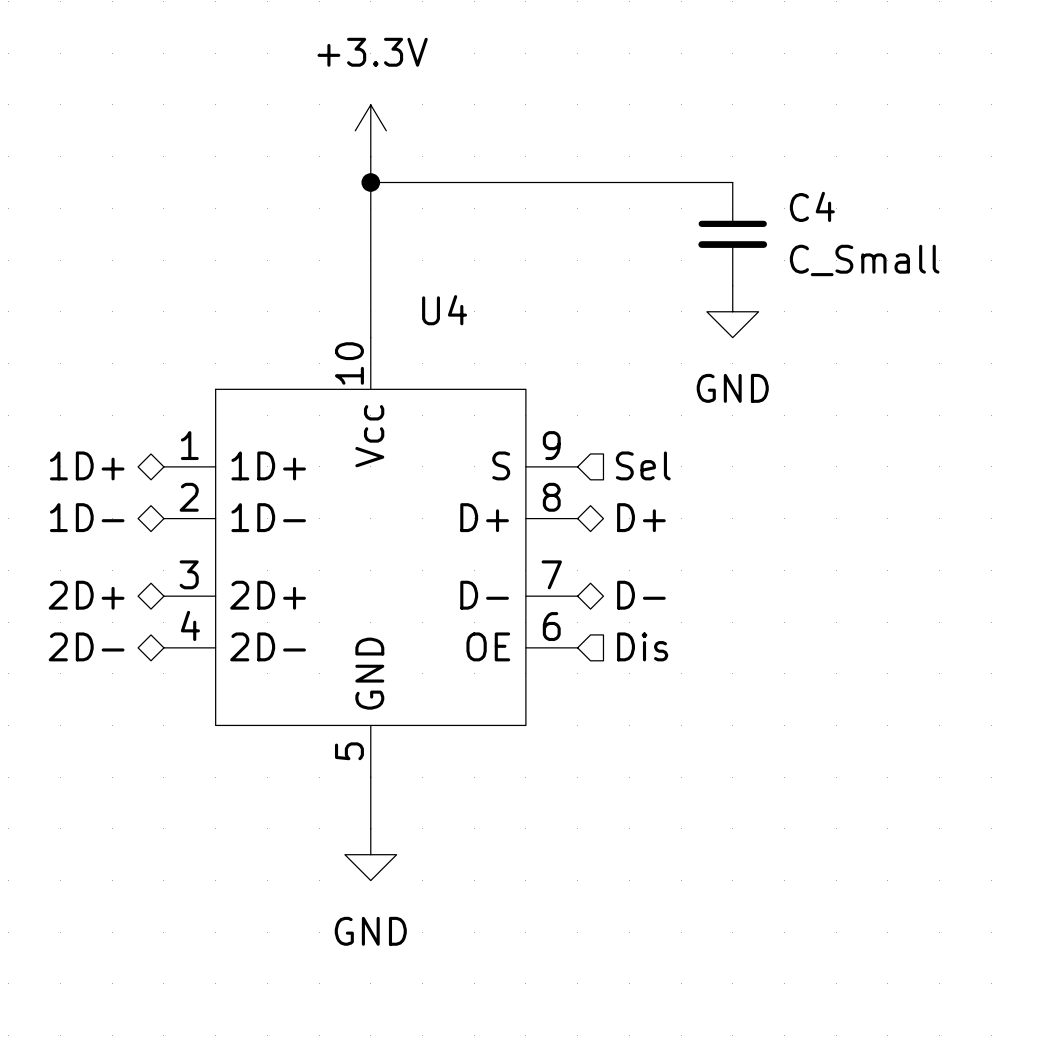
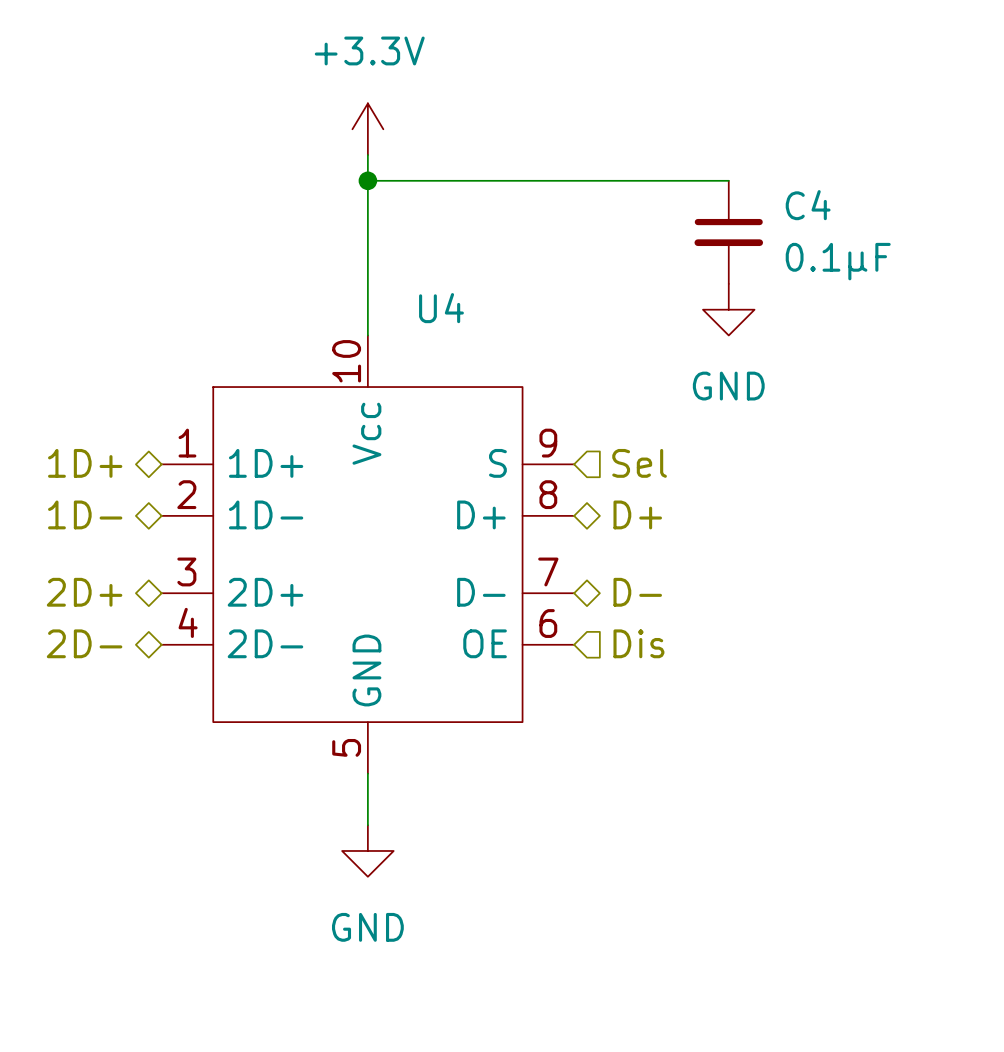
C4 value: C_Small (864, 260) -> 0.1μF (838, 261)

